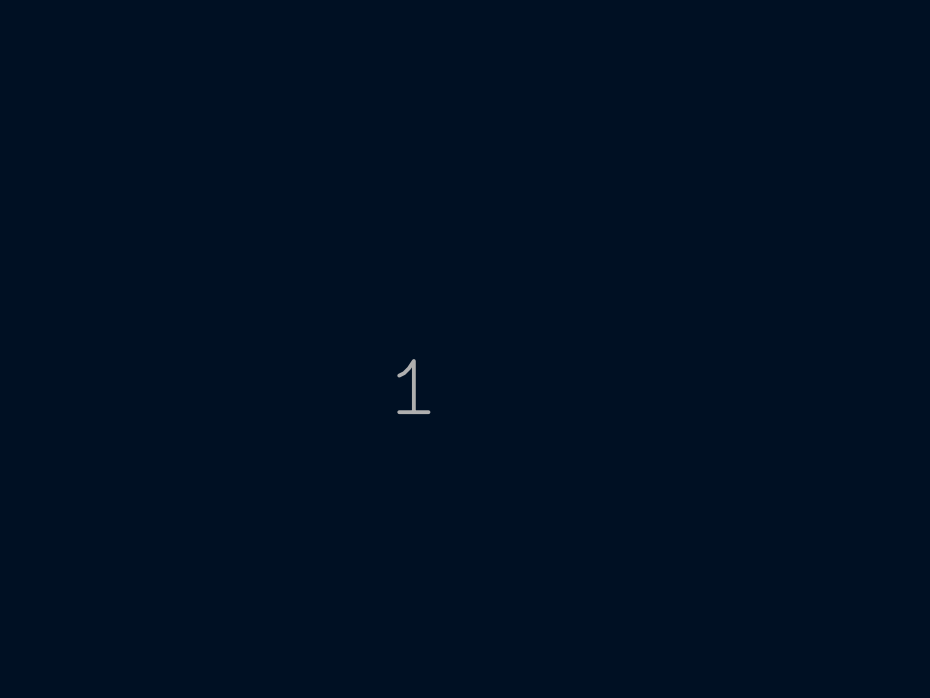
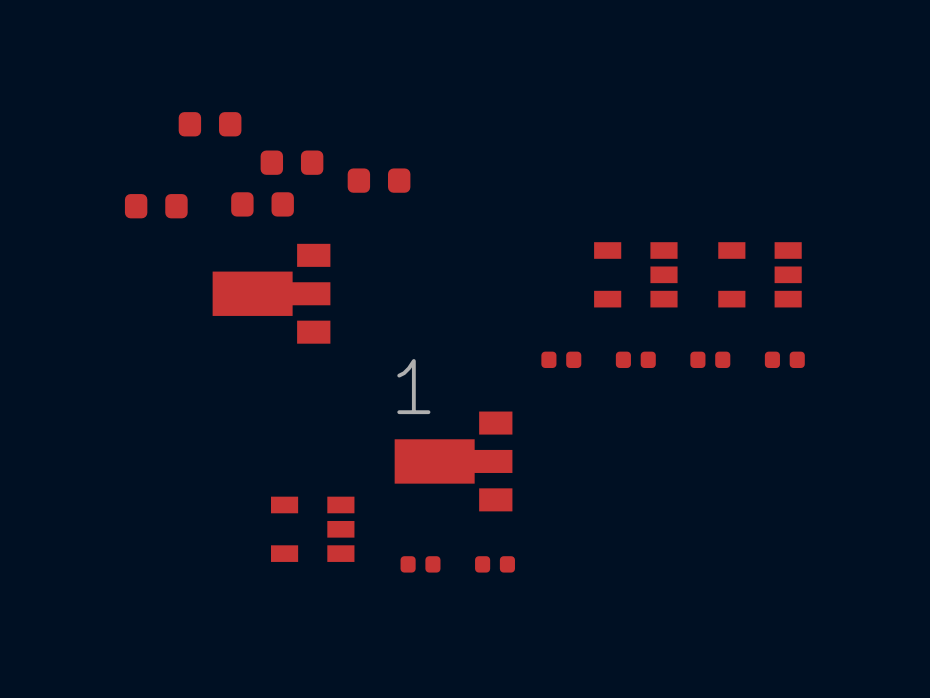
part: none -> (210, 124)
part: none -> (291, 162)
part: none -> (379, 180)
part: none -> (262, 204)
part: none -> (156, 206)
part: none -> (635, 274)
part: none -> (760, 274)
part: none -> (271, 293)
part: none -> (561, 359)
part: none -> (635, 359)
part: none -> (710, 359)
part: none -> (784, 359)
part: none -> (453, 461)
part: none -> (312, 529)
part: none -> (420, 564)
part: none -> (495, 564)

